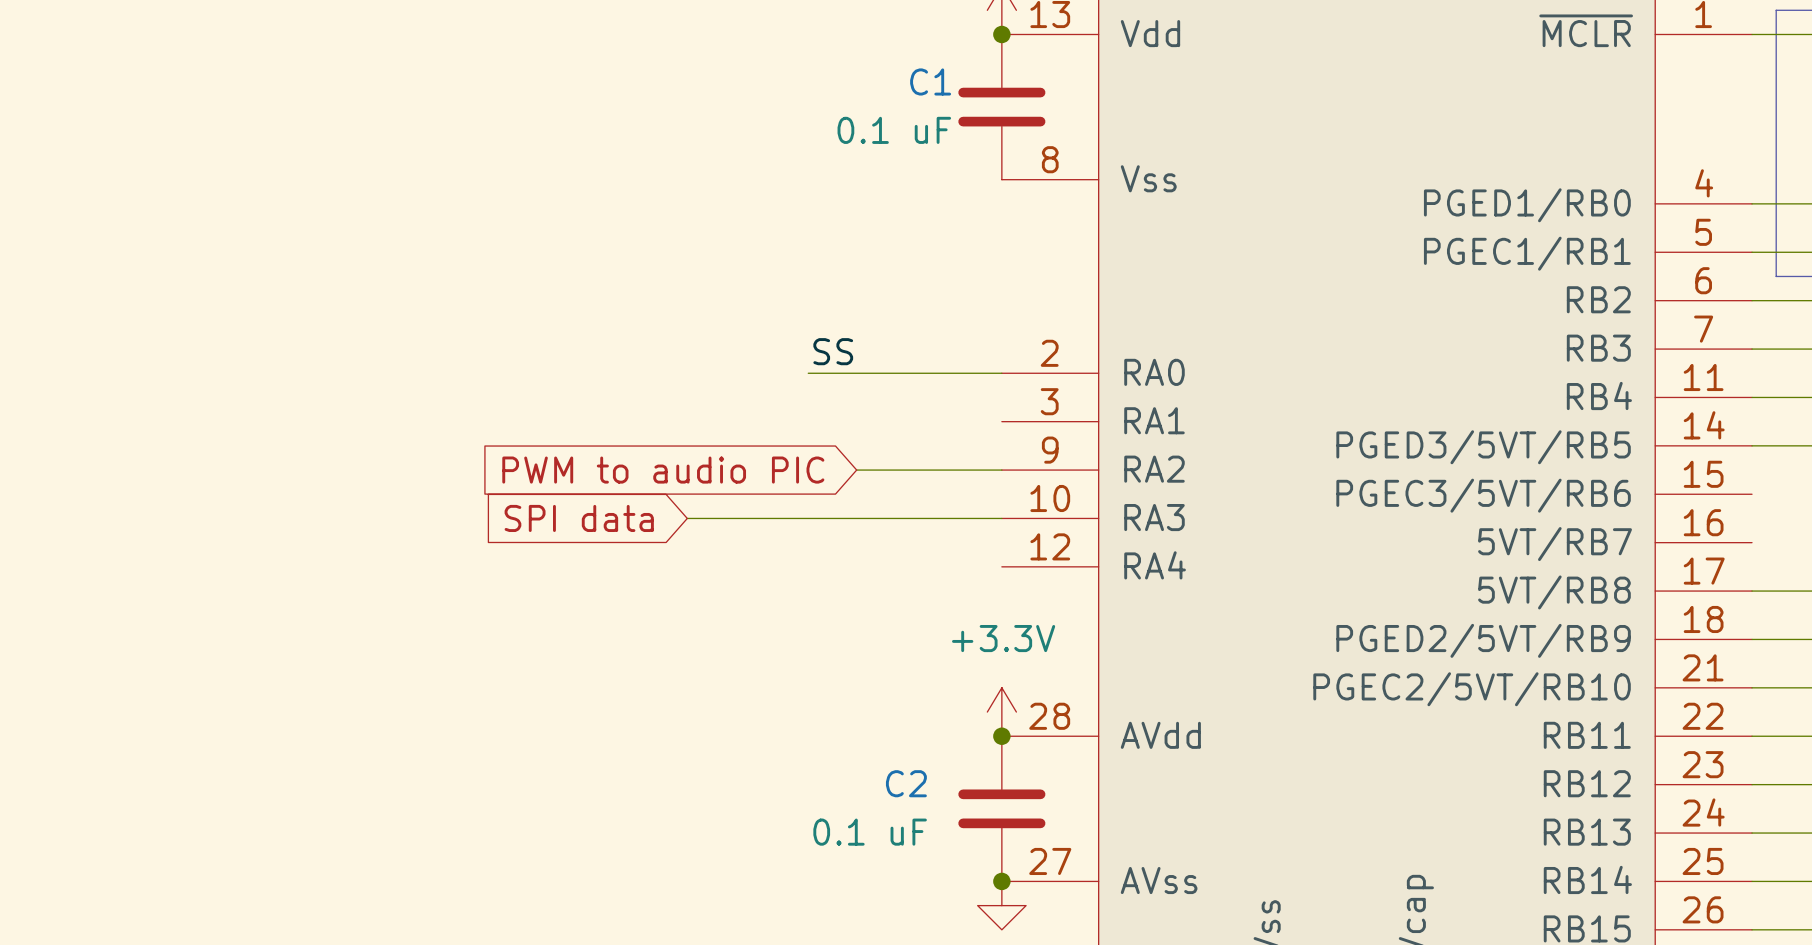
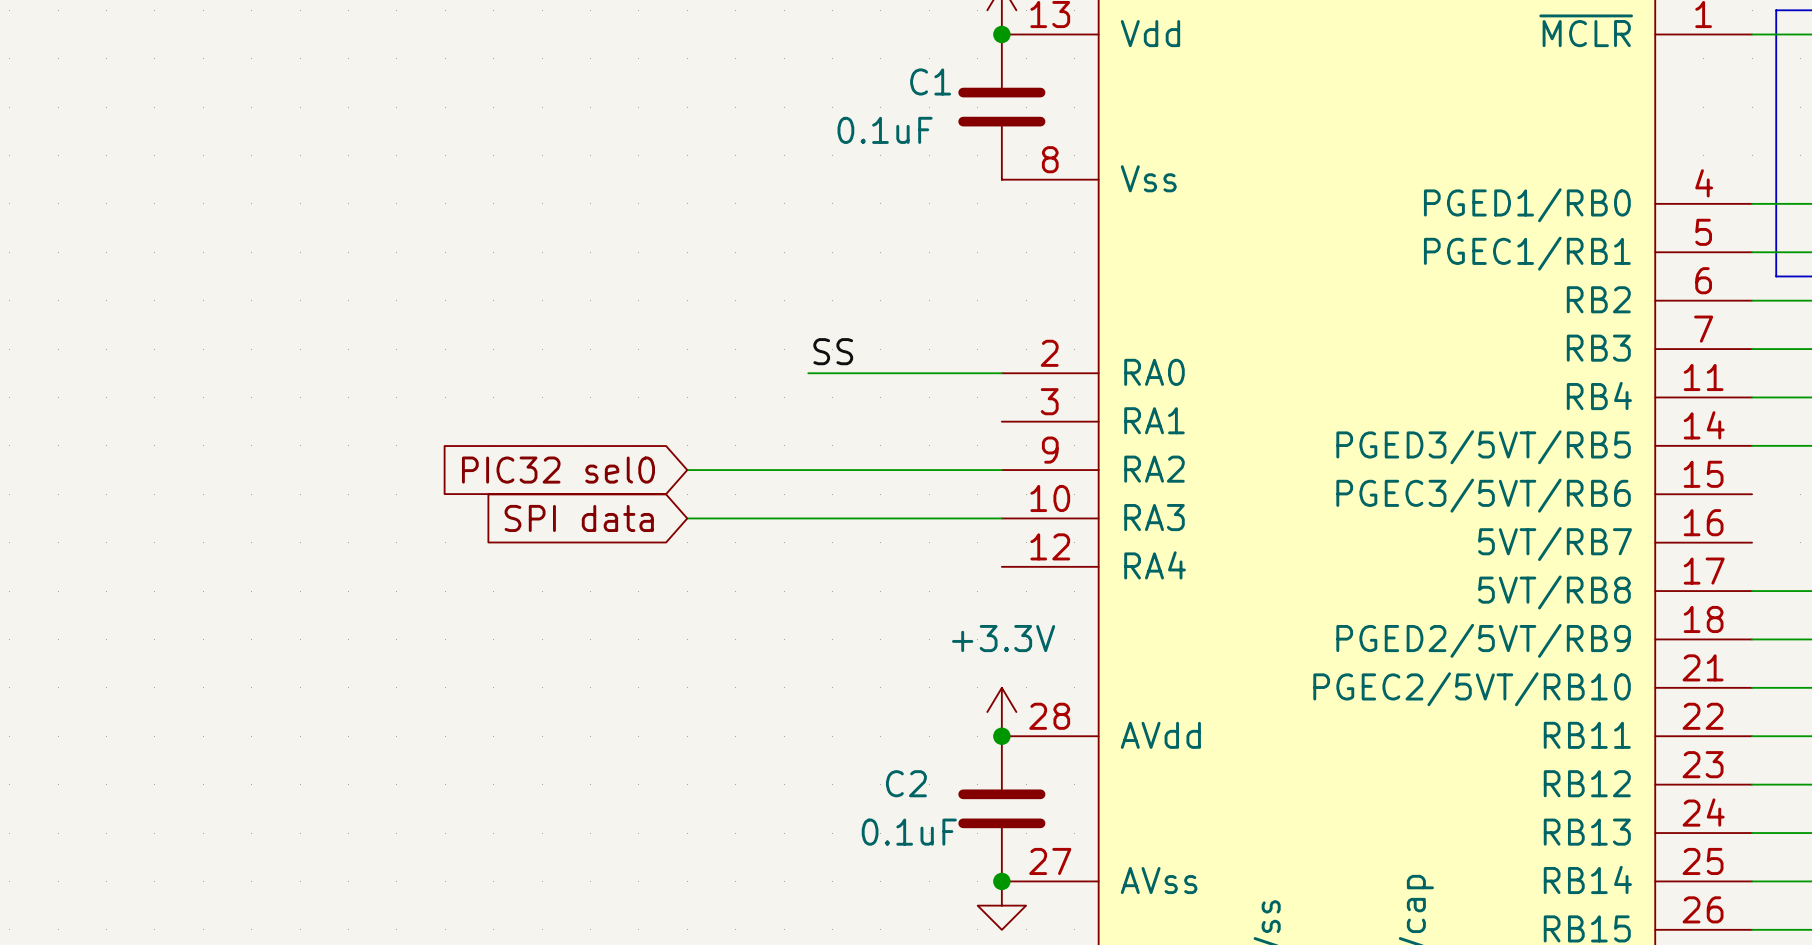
C1 value: 0.1 uF (894, 130) -> 0.1uF (885, 130)
global label: none -> PIC32 sel0 (558, 470)
global label: PWM to audio PIC (663, 470) -> none
wire: none -> (687, 470) (856, 470)
C2 value: 0.1 uF (870, 832) -> 0.1uF (909, 832)

